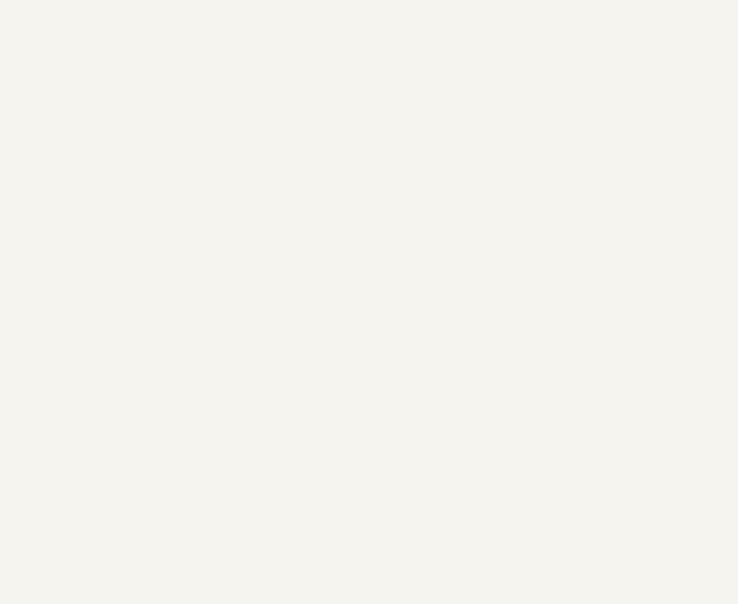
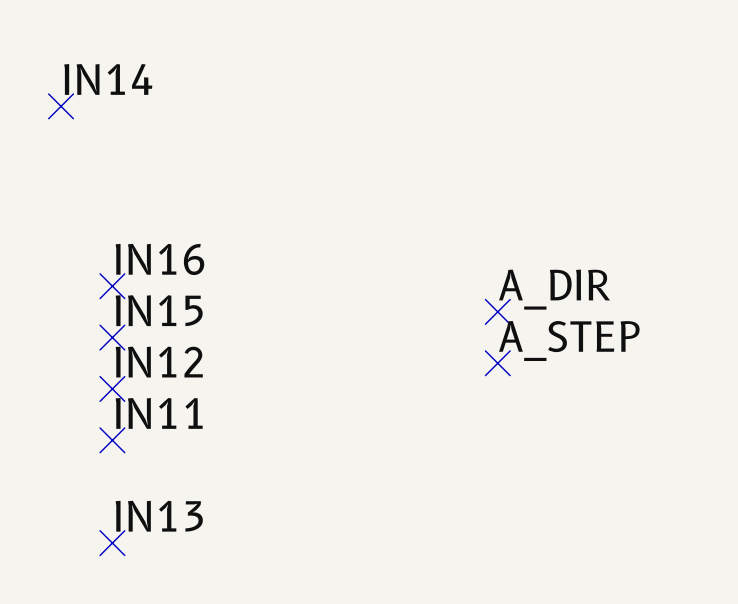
label: none -> IN14 (108, 79)
no-connect mark: none -> (61, 106)
label: none -> IN16 (159, 259)
no-connect mark: none -> (112, 286)
label: none -> A_DIR (554, 289)
label: none -> IN15 (159, 310)
no-connect mark: none -> (497, 311)
no-connect mark: none -> (112, 337)
label: none -> A_STEP (569, 340)
label: none -> IN12 (159, 362)
no-connect mark: none -> (497, 363)
no-connect mark: none -> (112, 388)
label: none -> IN11 (159, 413)
no-connect mark: none -> (112, 440)
label: none -> IN13 (159, 516)
no-connect mark: none -> (112, 543)

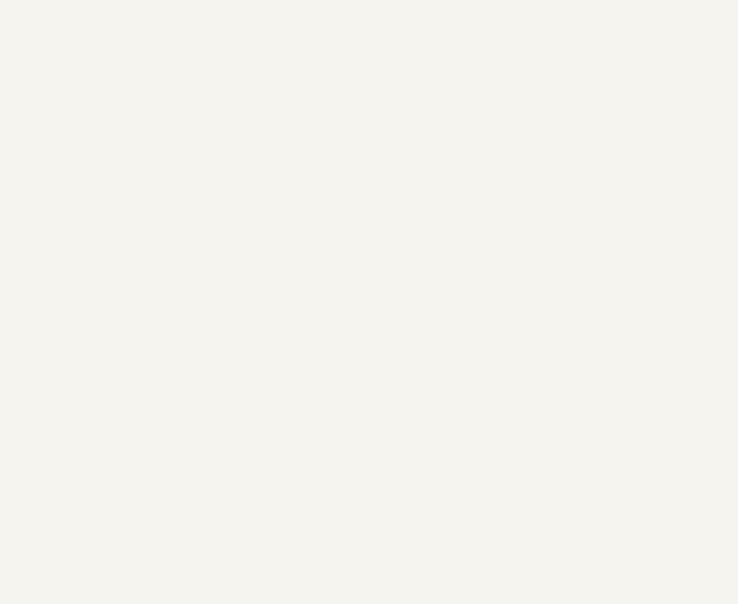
label: IN14 (108, 79) -> none
no-connect mark: (61, 106) -> none
label: IN16 (159, 259) -> none
no-connect mark: (112, 286) -> none
label: A_DIR (554, 289) -> none
label: IN15 (159, 310) -> none
no-connect mark: (497, 311) -> none
no-connect mark: (112, 337) -> none
label: A_STEP (569, 340) -> none
label: IN12 (159, 362) -> none
no-connect mark: (497, 363) -> none
no-connect mark: (112, 388) -> none
label: IN11 (159, 413) -> none
no-connect mark: (112, 440) -> none
label: IN13 (159, 516) -> none
no-connect mark: (112, 543) -> none

